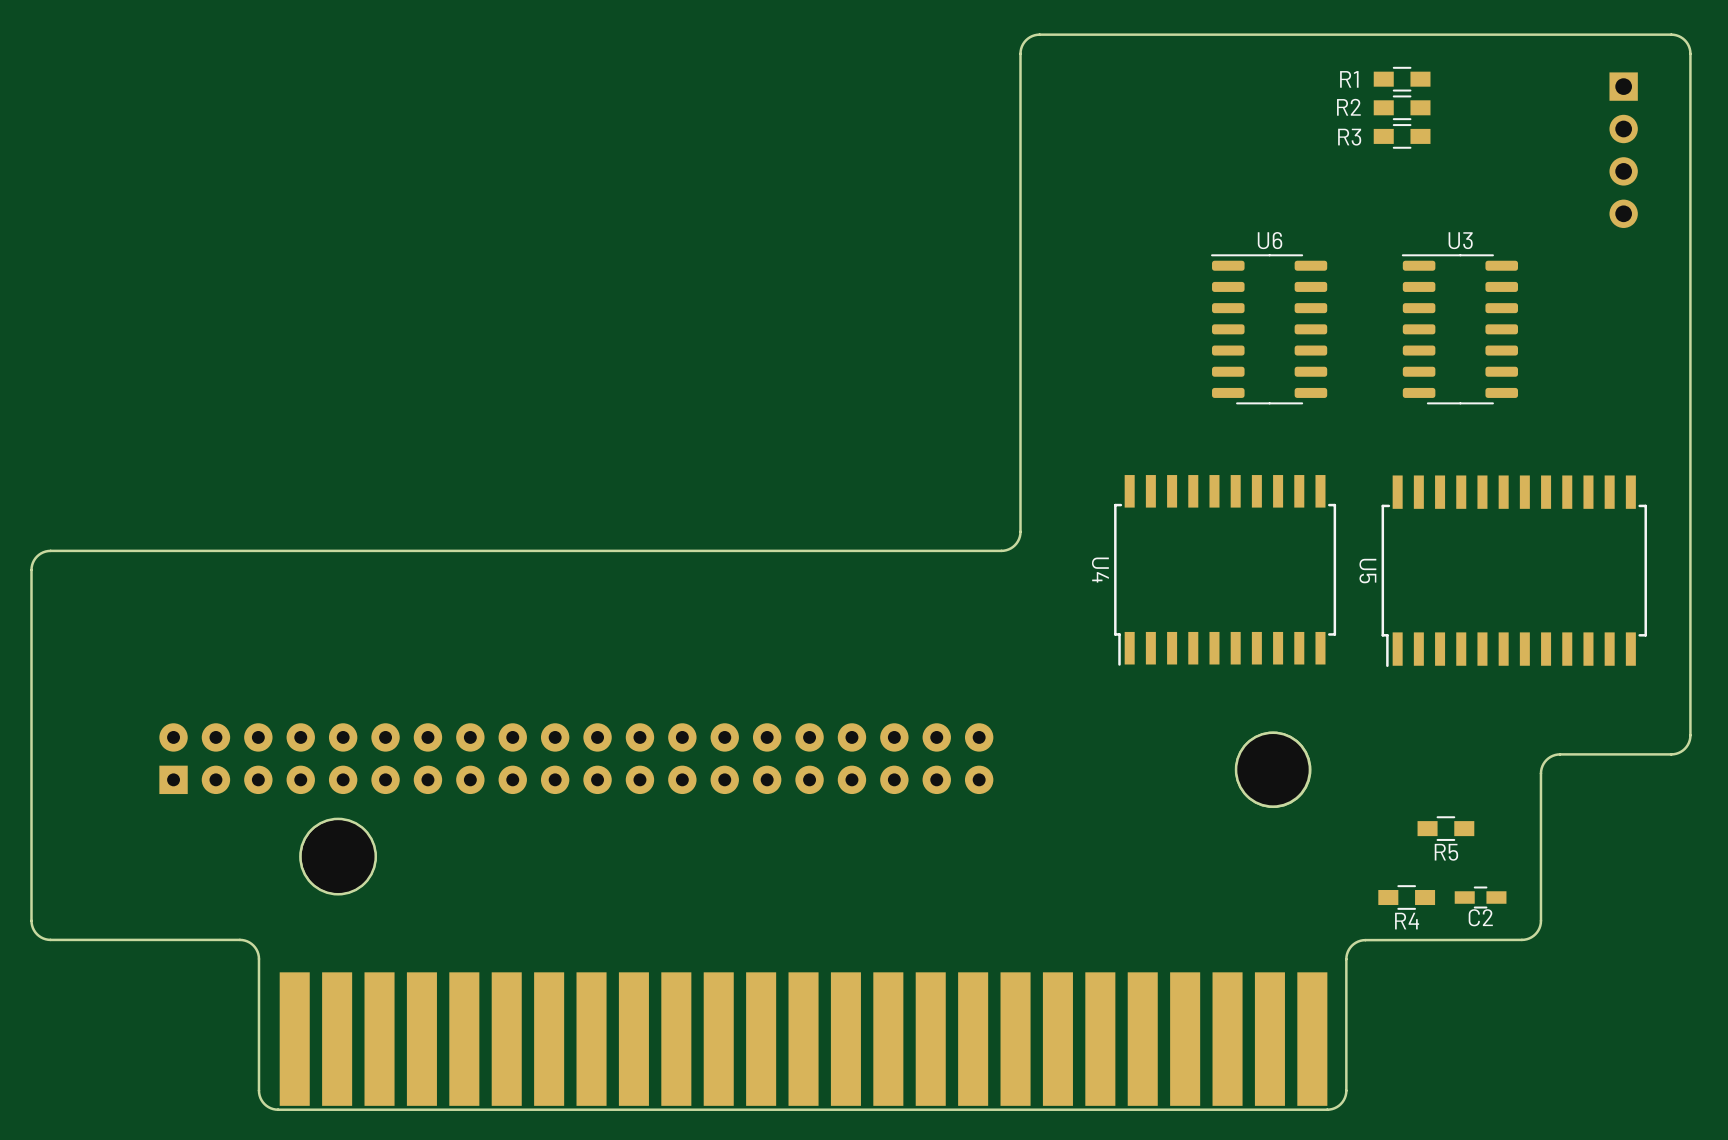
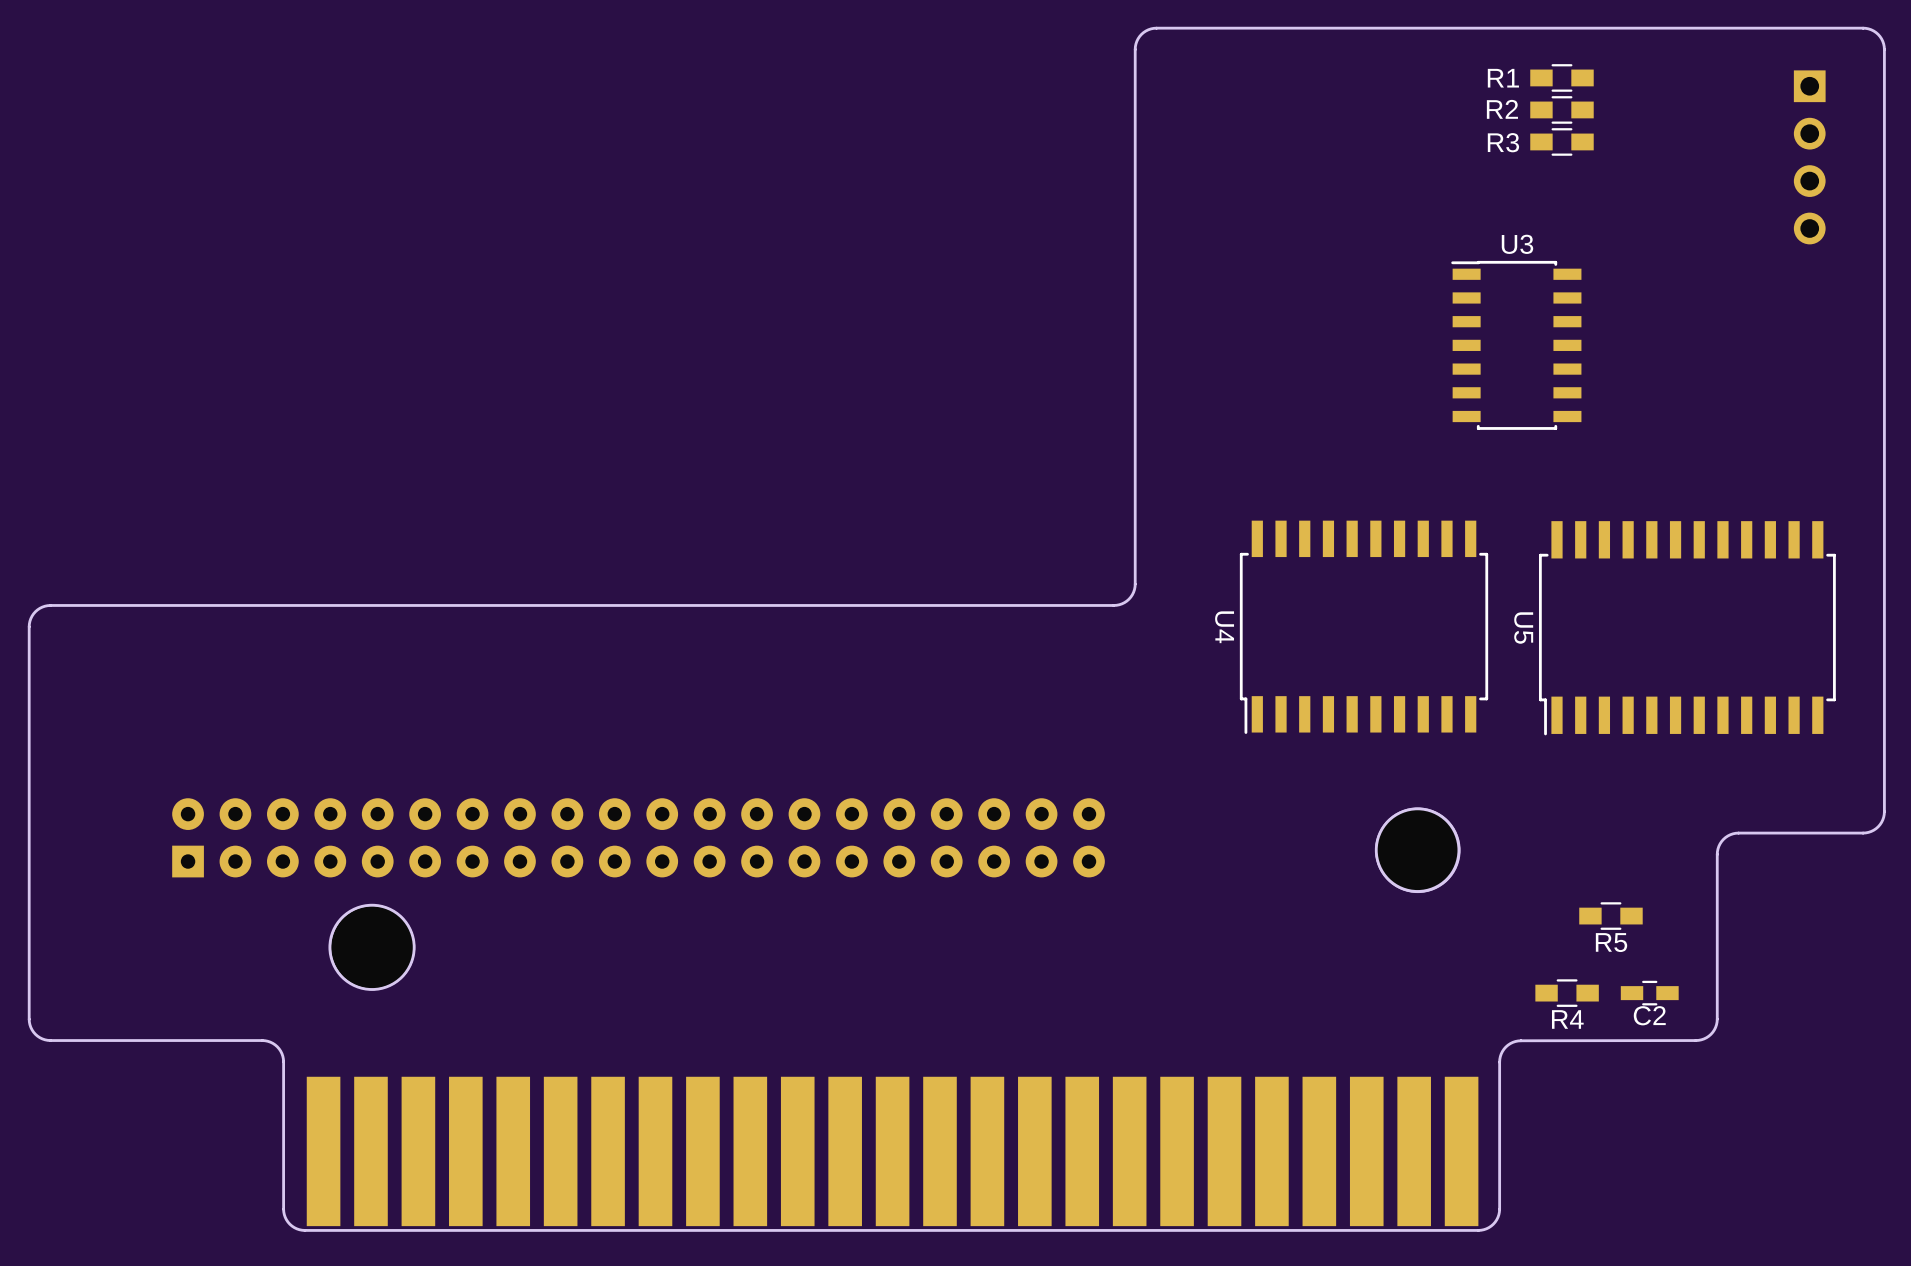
U3 footprint: [1401, 254, 1519, 405] -> [1451, 260, 1582, 430]
U6: (1269, 329) -> none

